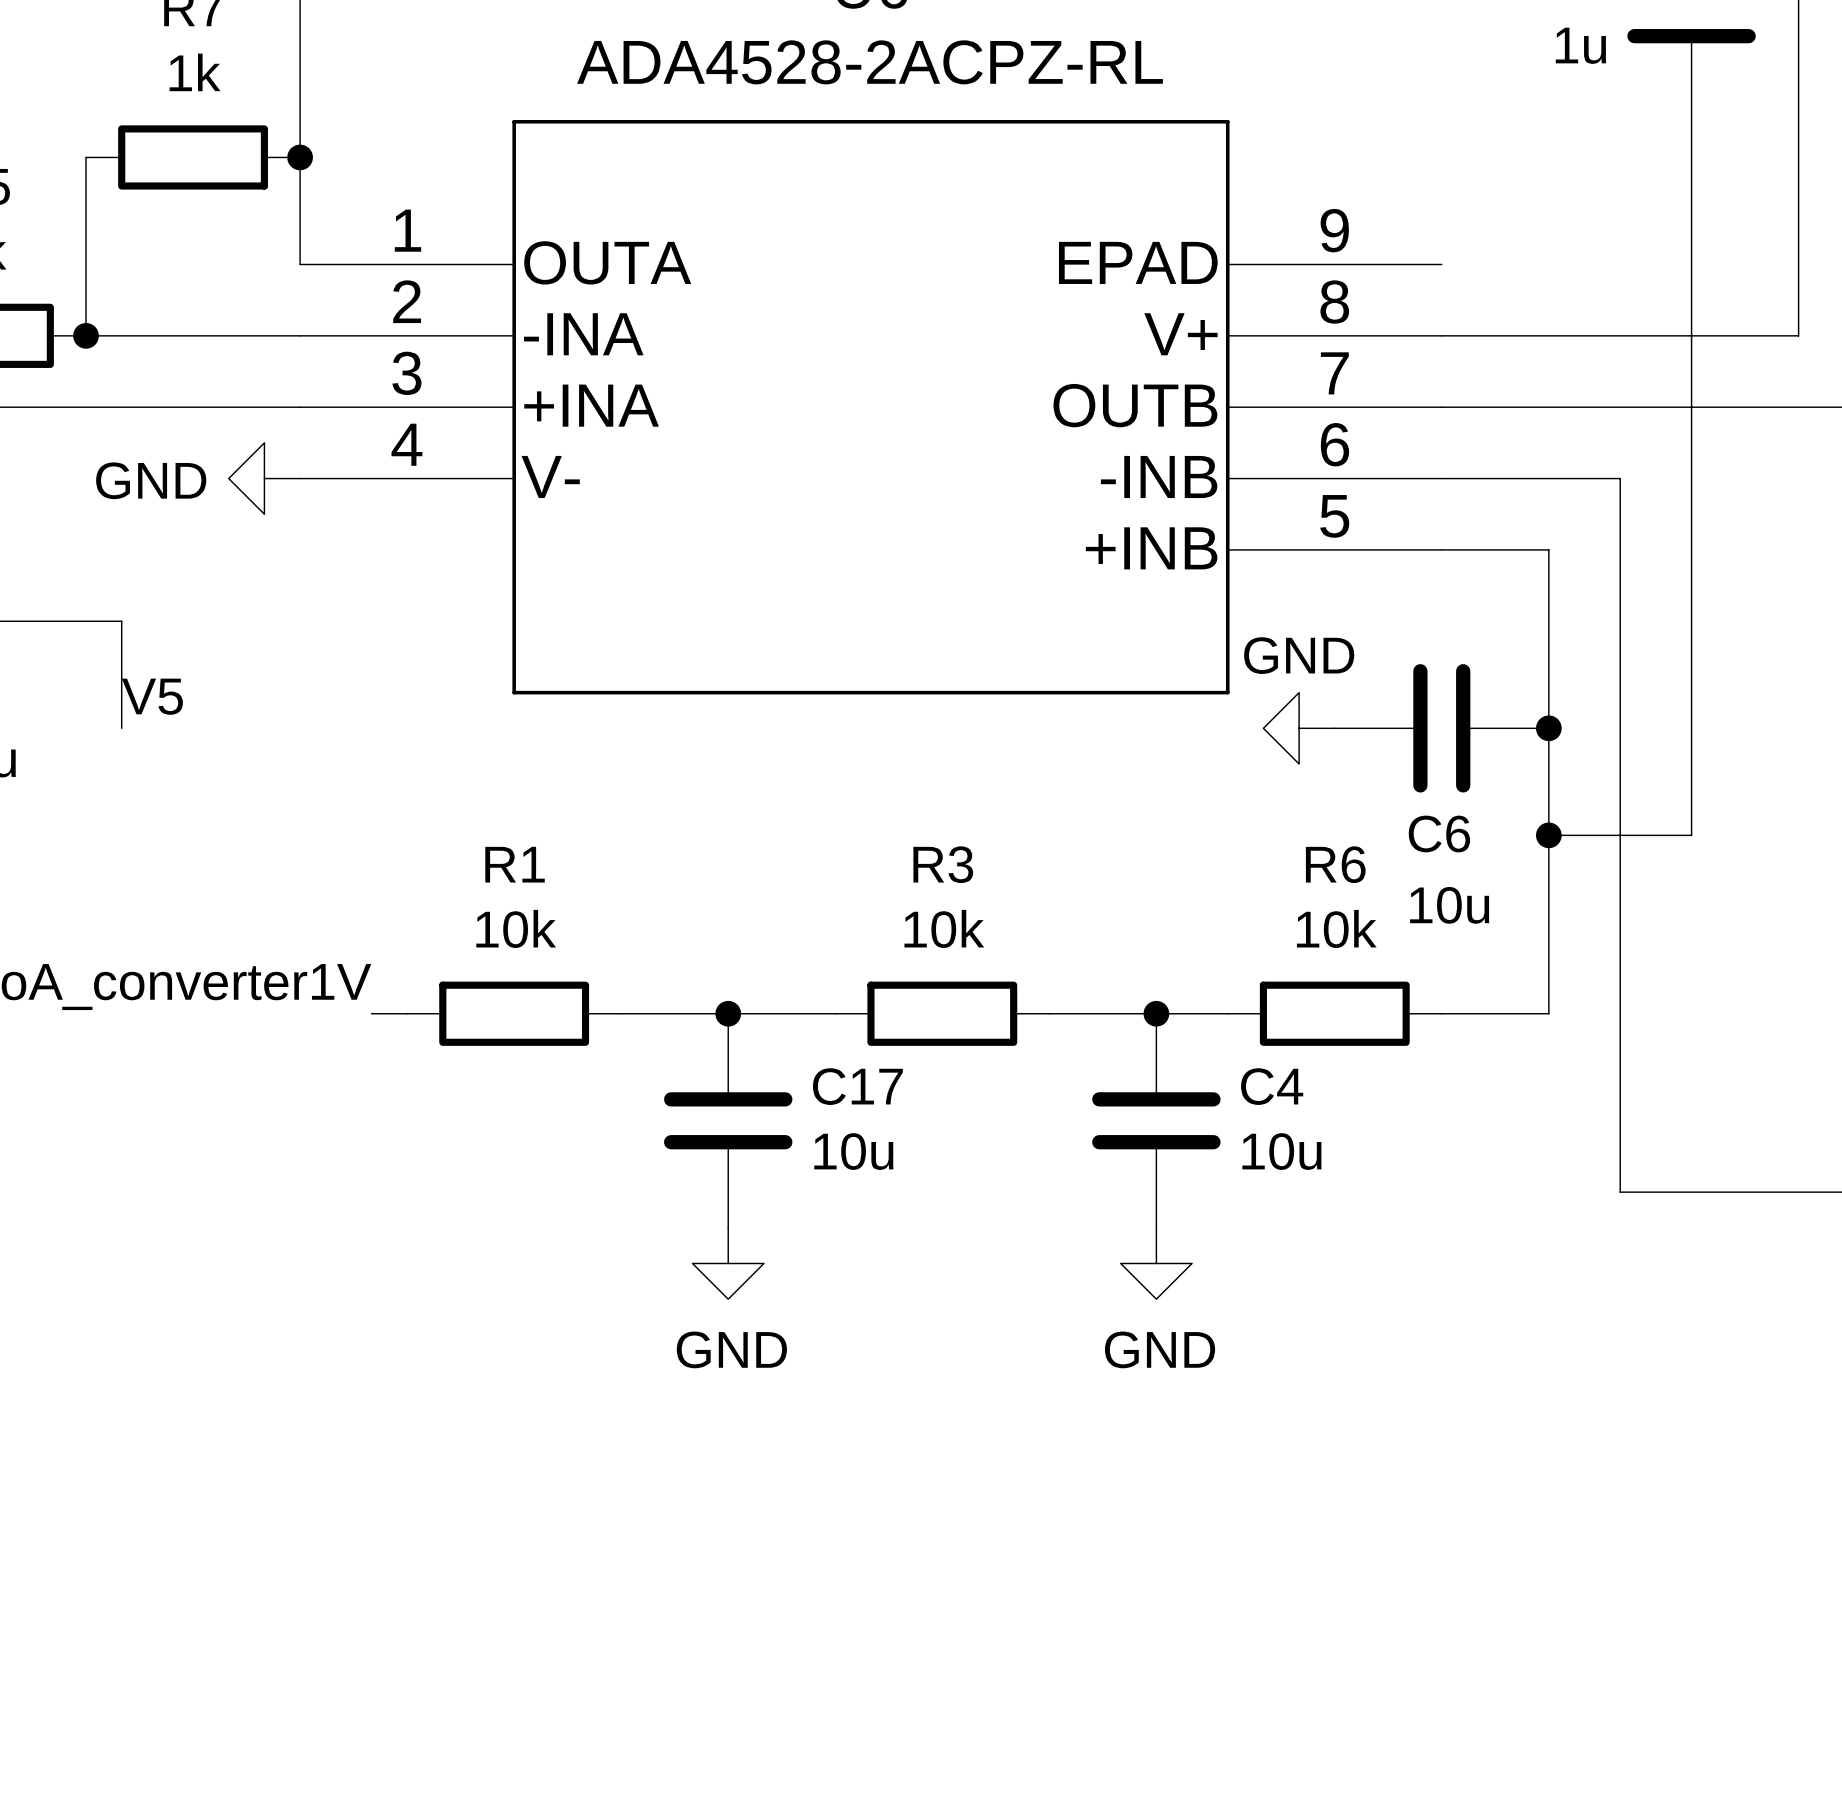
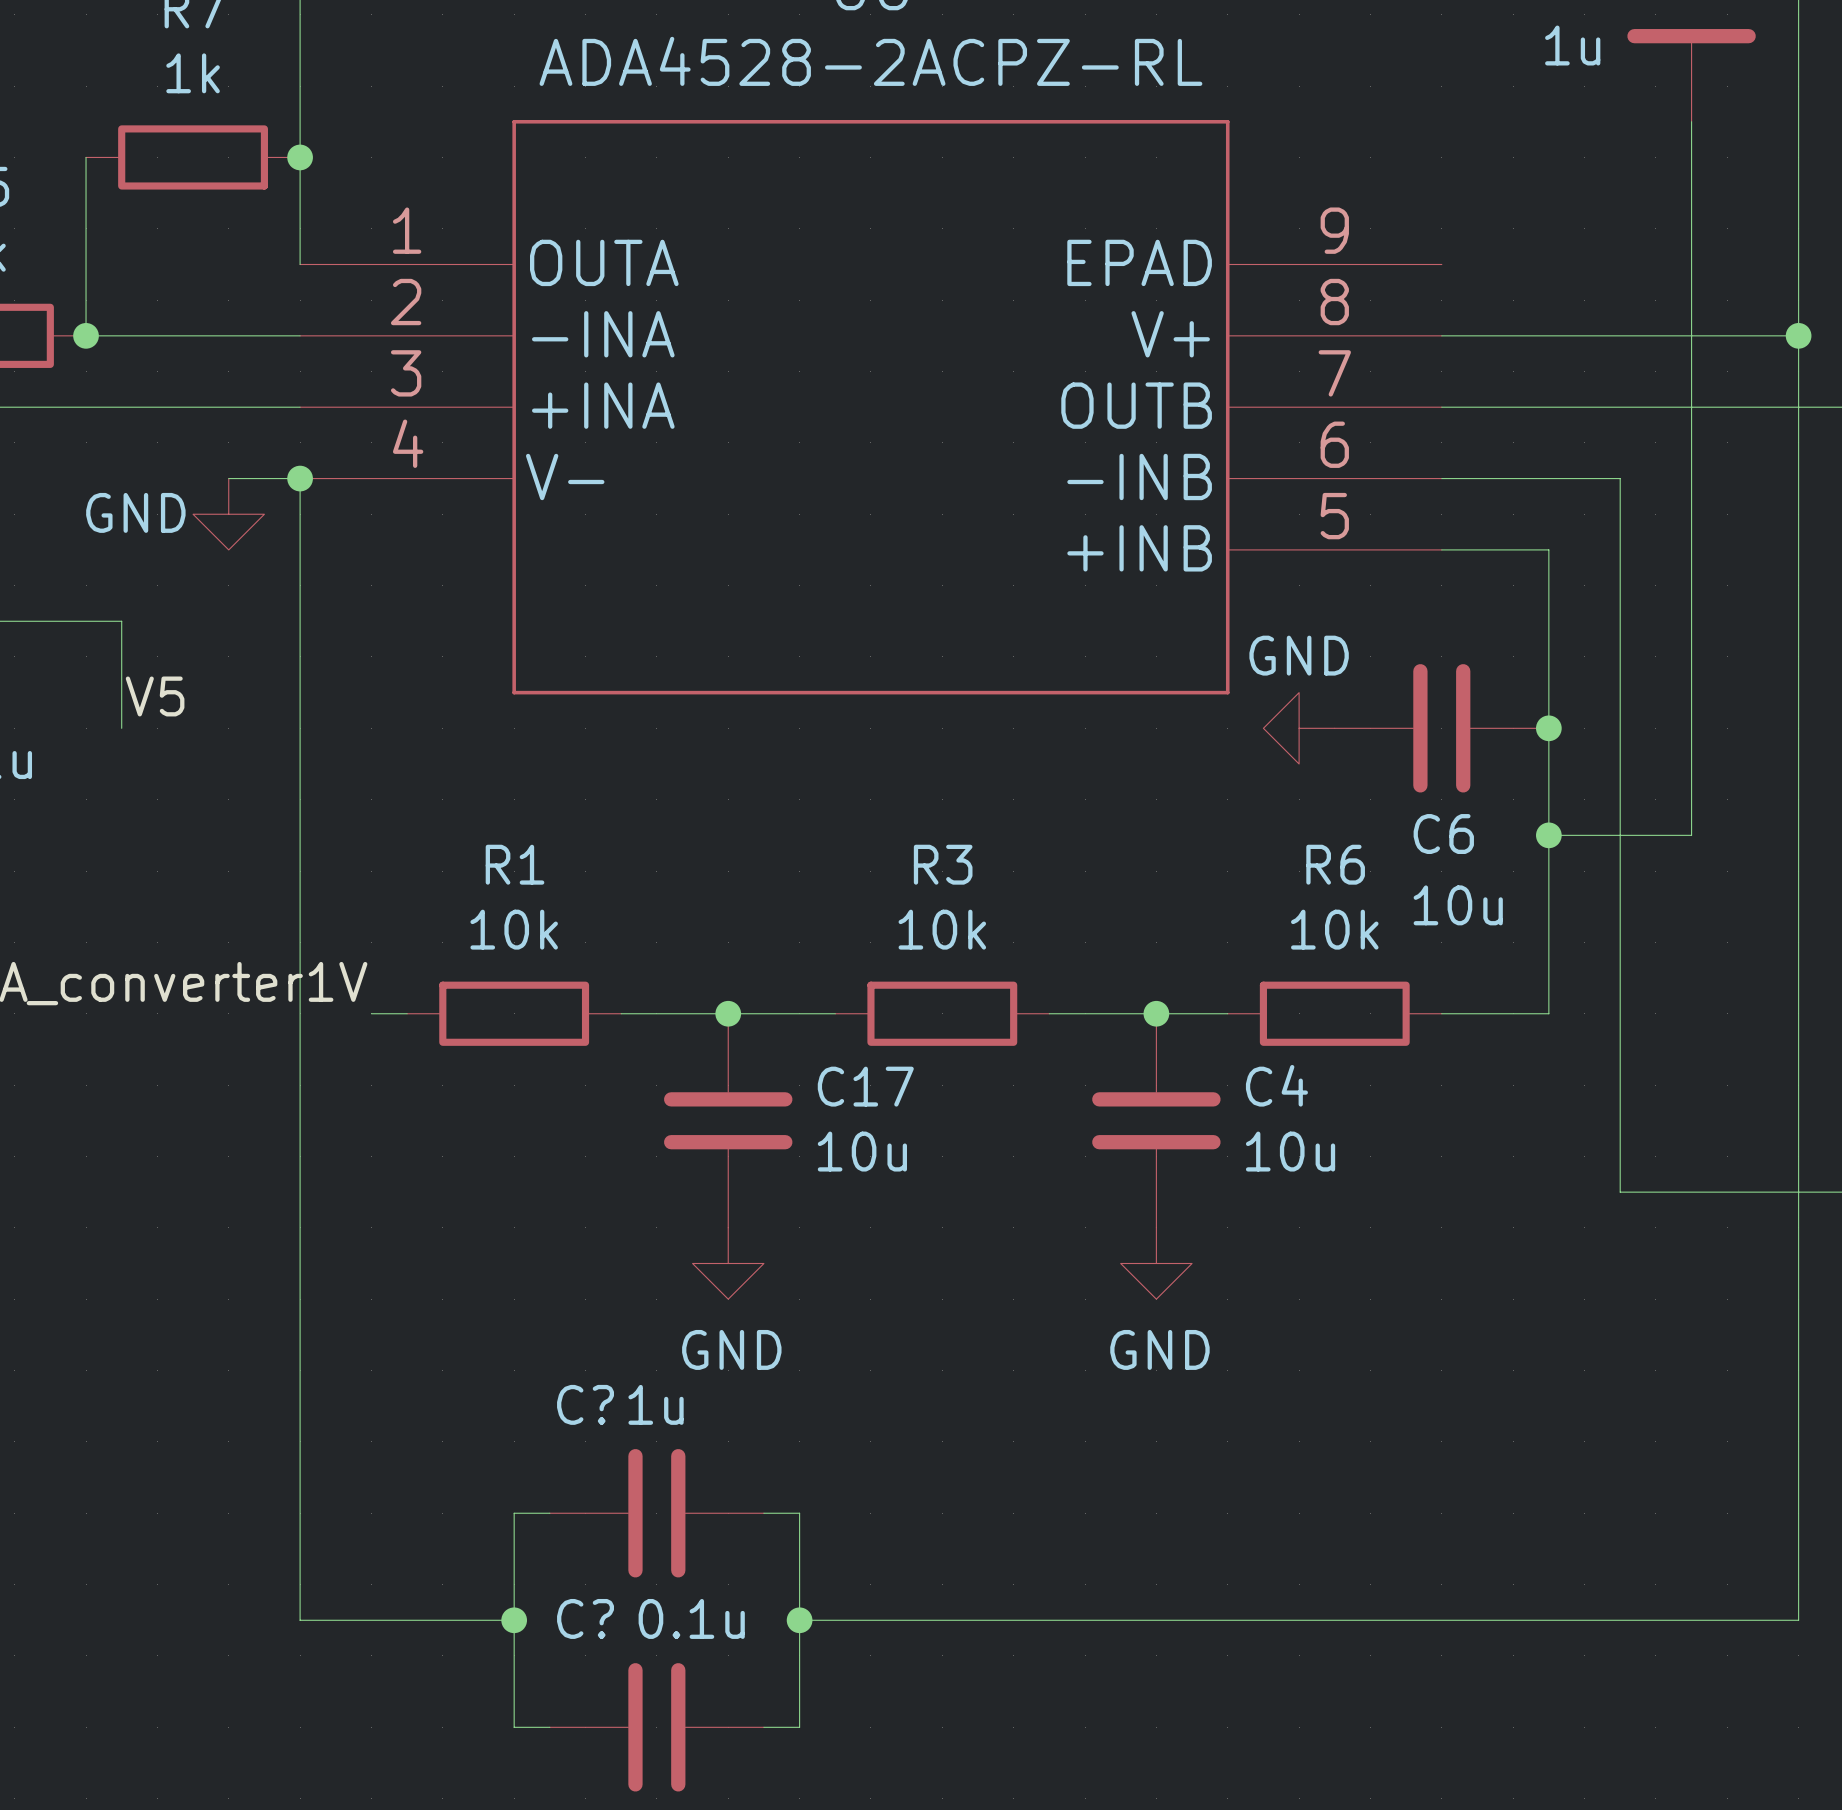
wire: none -> (1798, 335) (1798, 1620) (799, 1620)
junction: none -> (1798, 335)
wire: none -> (228, 478) (300, 478) (300, 1620) (514, 1620)
power symbol rotation: 0° (264, 478) -> 90° counterclockwise (228, 514)
power symbol position: GND (264, 478) -> GND (228, 514)
junction: none -> (300, 478)
wire: none -> (549, 1513) (514, 1513) (514, 1727) (549, 1727)
C?: none -> 1u (656, 1513)
wire: none -> (763, 1513) (799, 1513) (799, 1727) (763, 1727)
junction: none -> (514, 1620)
junction: none -> (799, 1620)
C?: none -> 0.1u (656, 1727)

